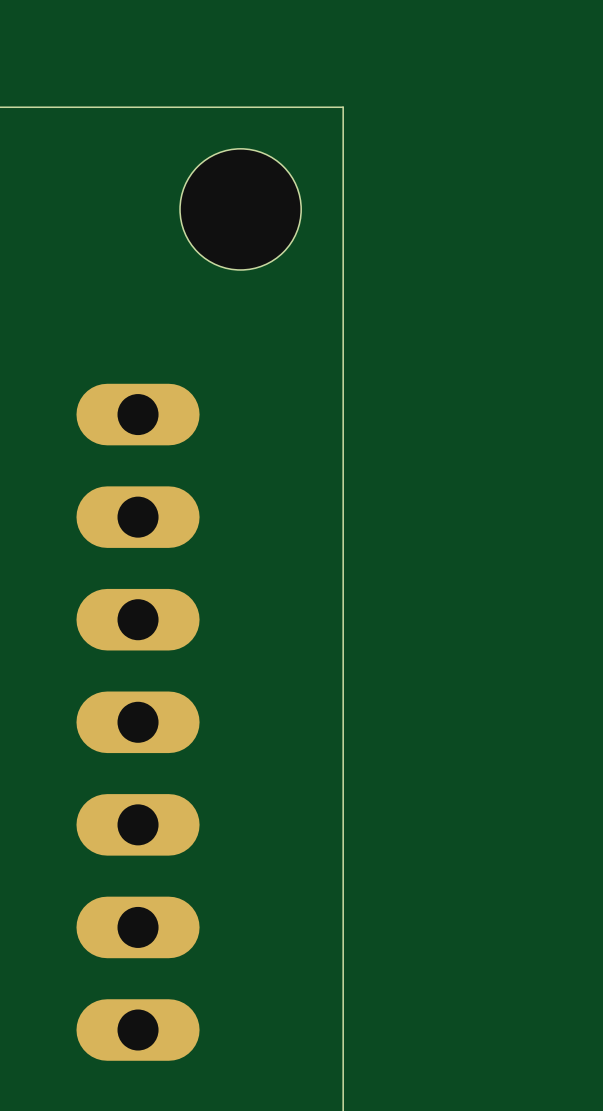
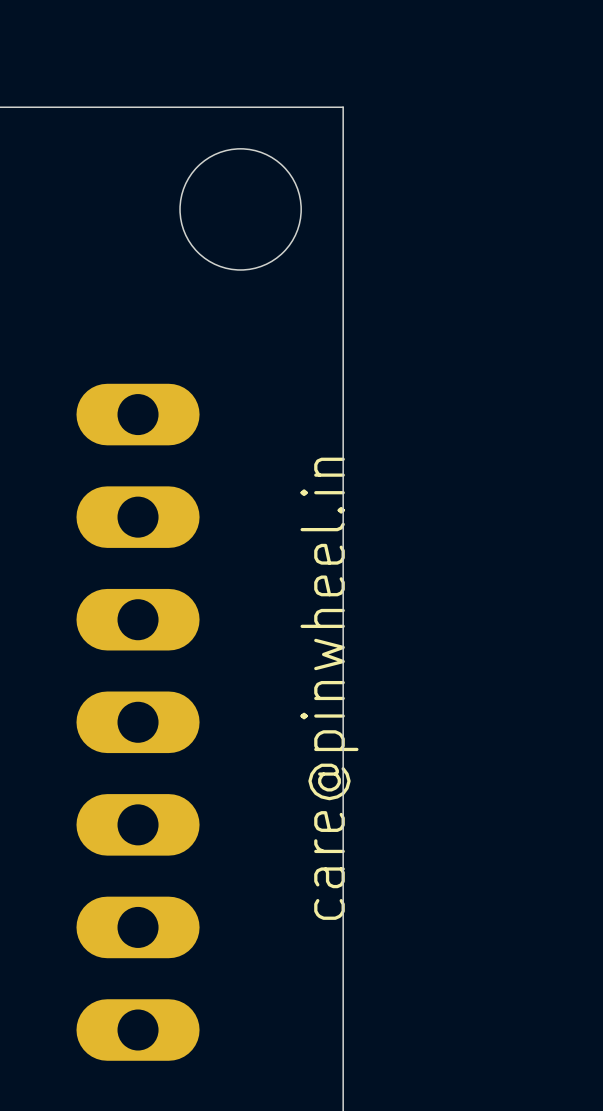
text: none -> care@pinwheel.in (329, 688)

